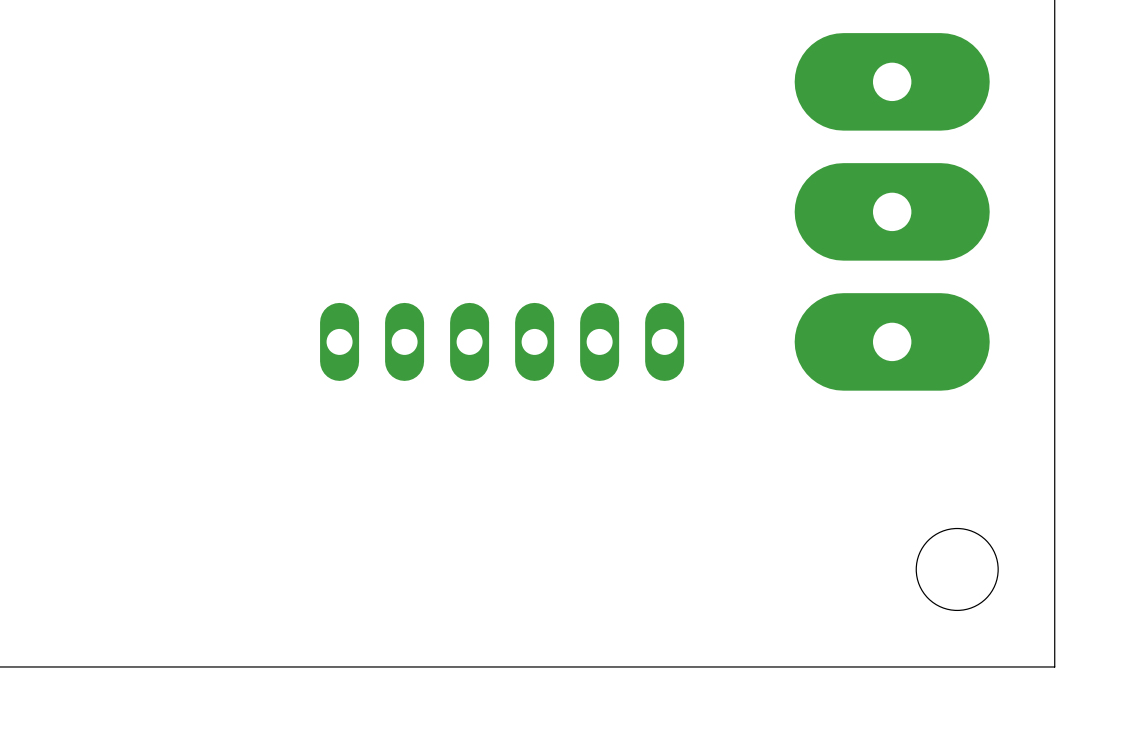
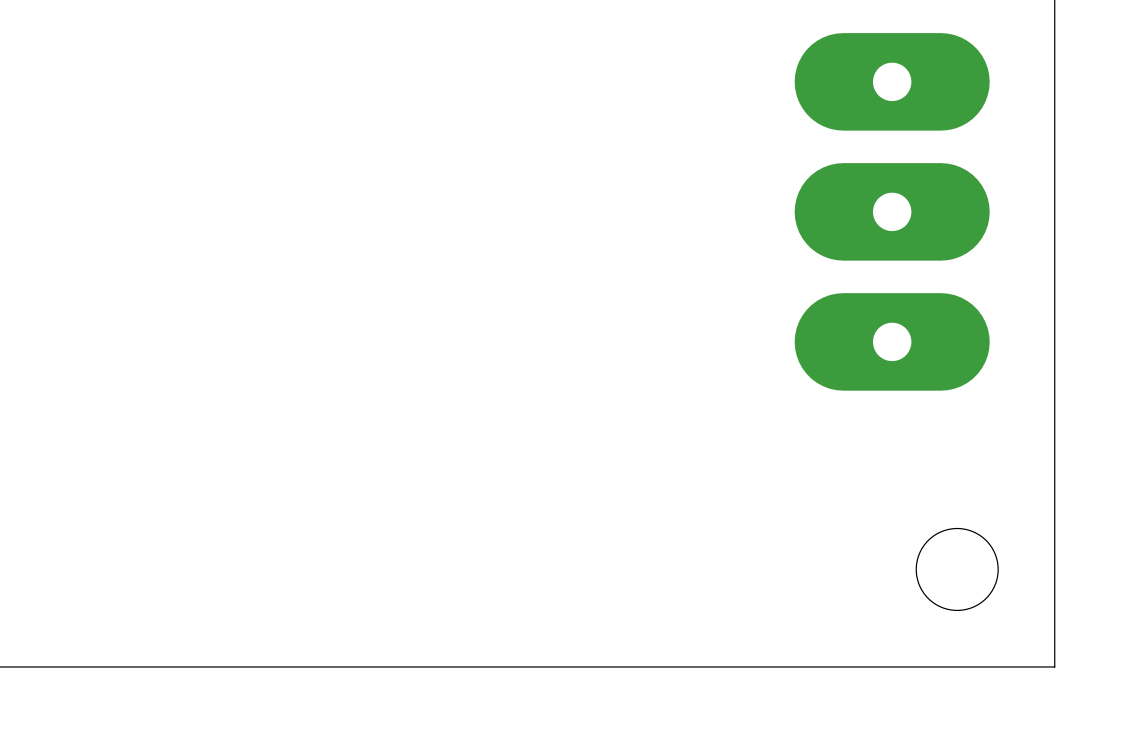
part: (502, 341) -> none

